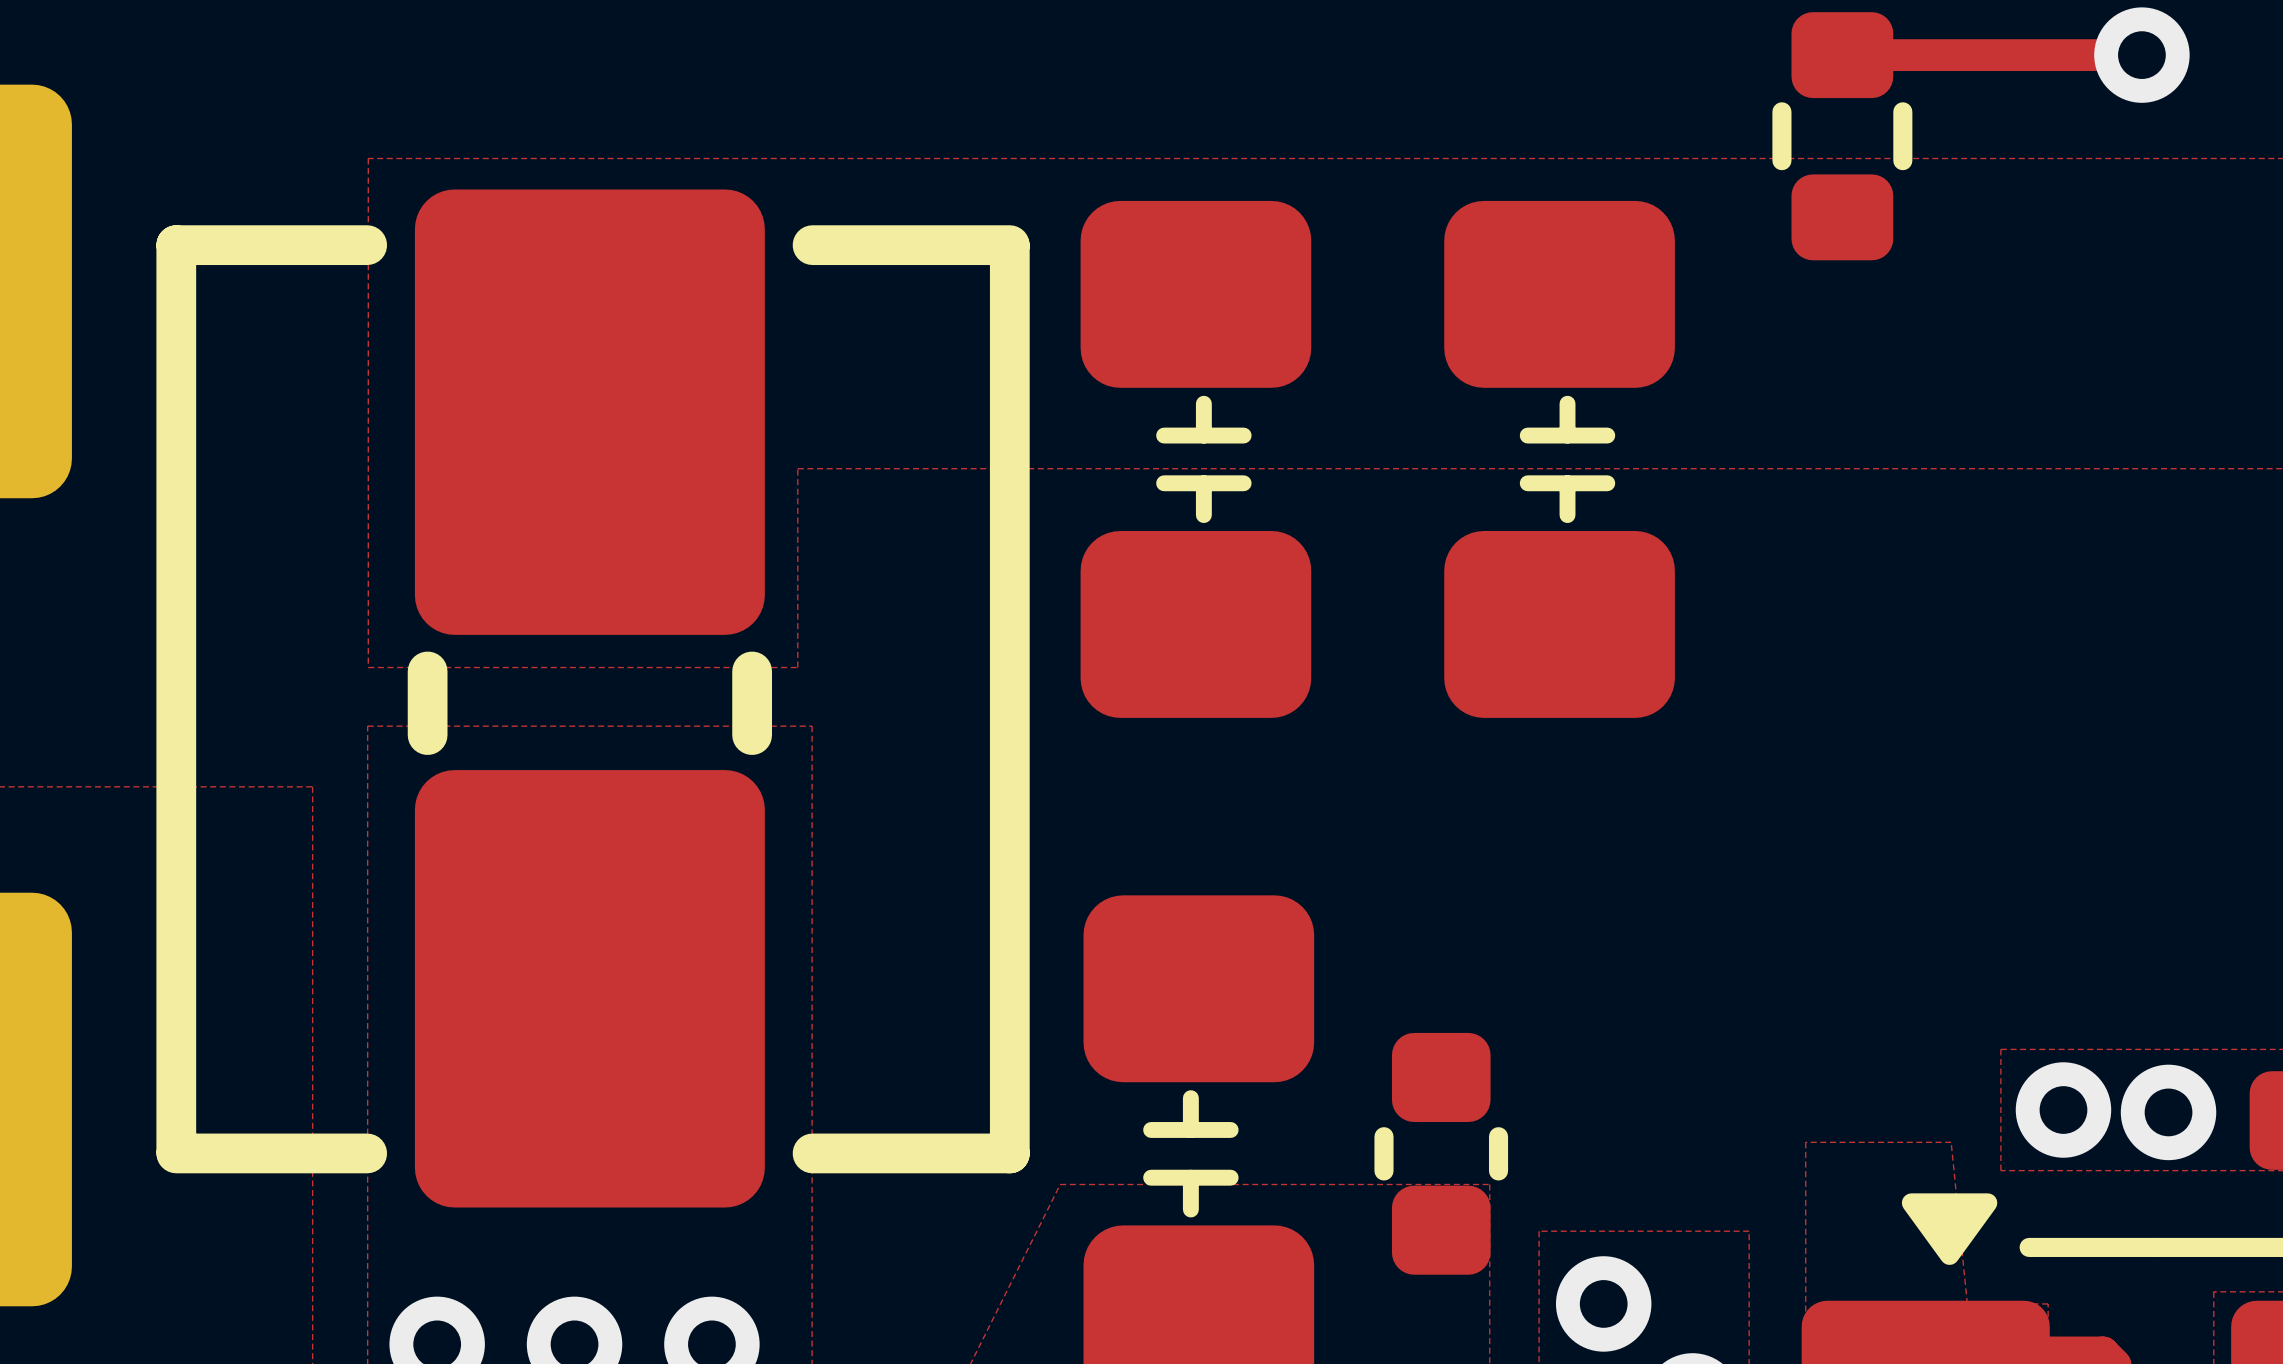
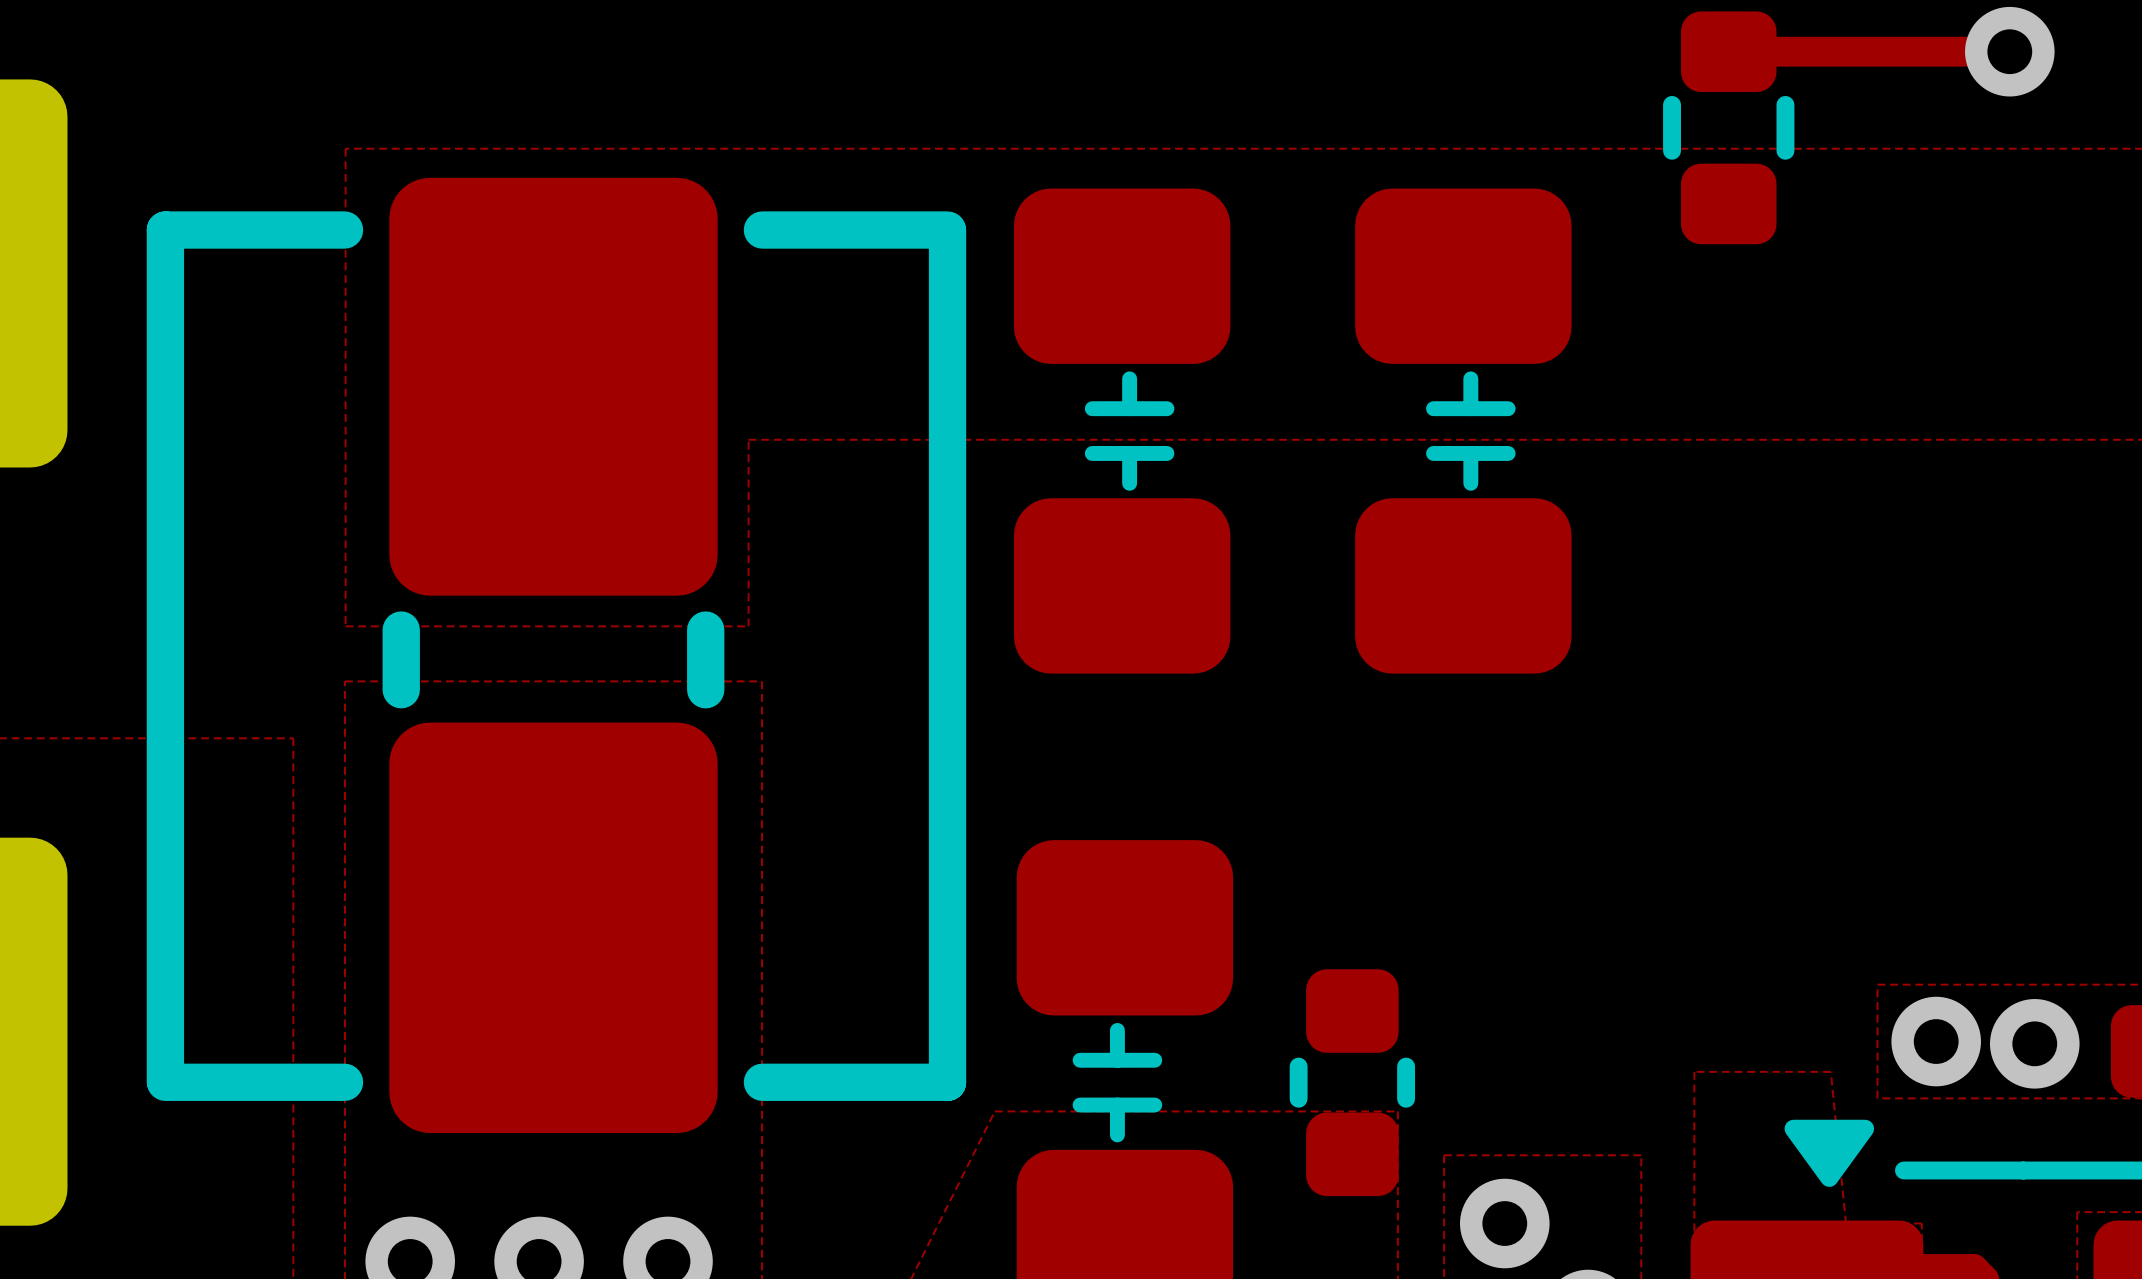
part footprint: [156, 189, 1030, 1208] -> [146, 177, 967, 1134]

